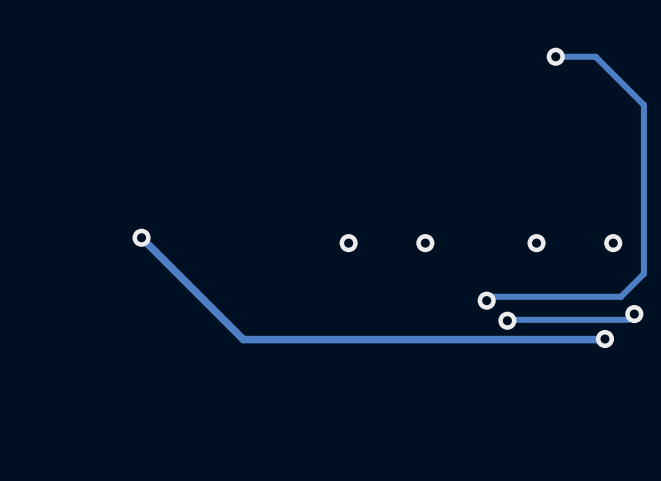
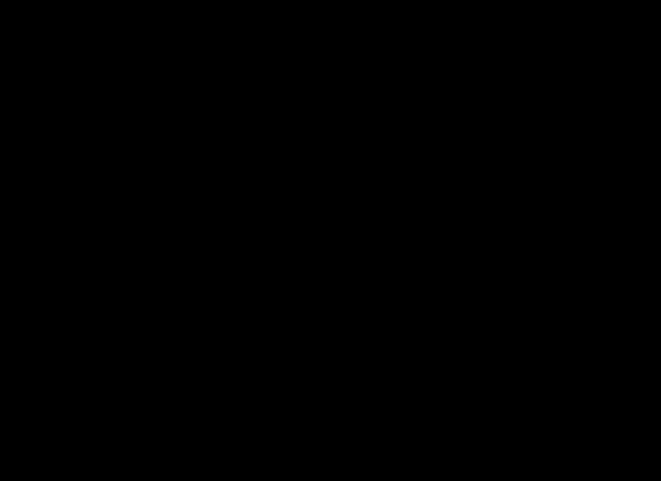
via: (555, 56) -> none
track: (555, 59) (555, 56) (595, 56) (643, 105) (643, 273) (620, 296) (490, 296) (486, 300) -> none
track: (141, 237) (243, 339) (604, 338) -> none
via: (141, 237) -> none
via: (348, 243) -> none
via: (425, 243) -> none
via: (536, 243) -> none
via: (613, 243) -> none
via: (486, 300) -> none
via: (634, 314) -> none
track: (628, 319) (507, 320) -> none
via: (507, 320) -> none
via: (604, 338) -> none

